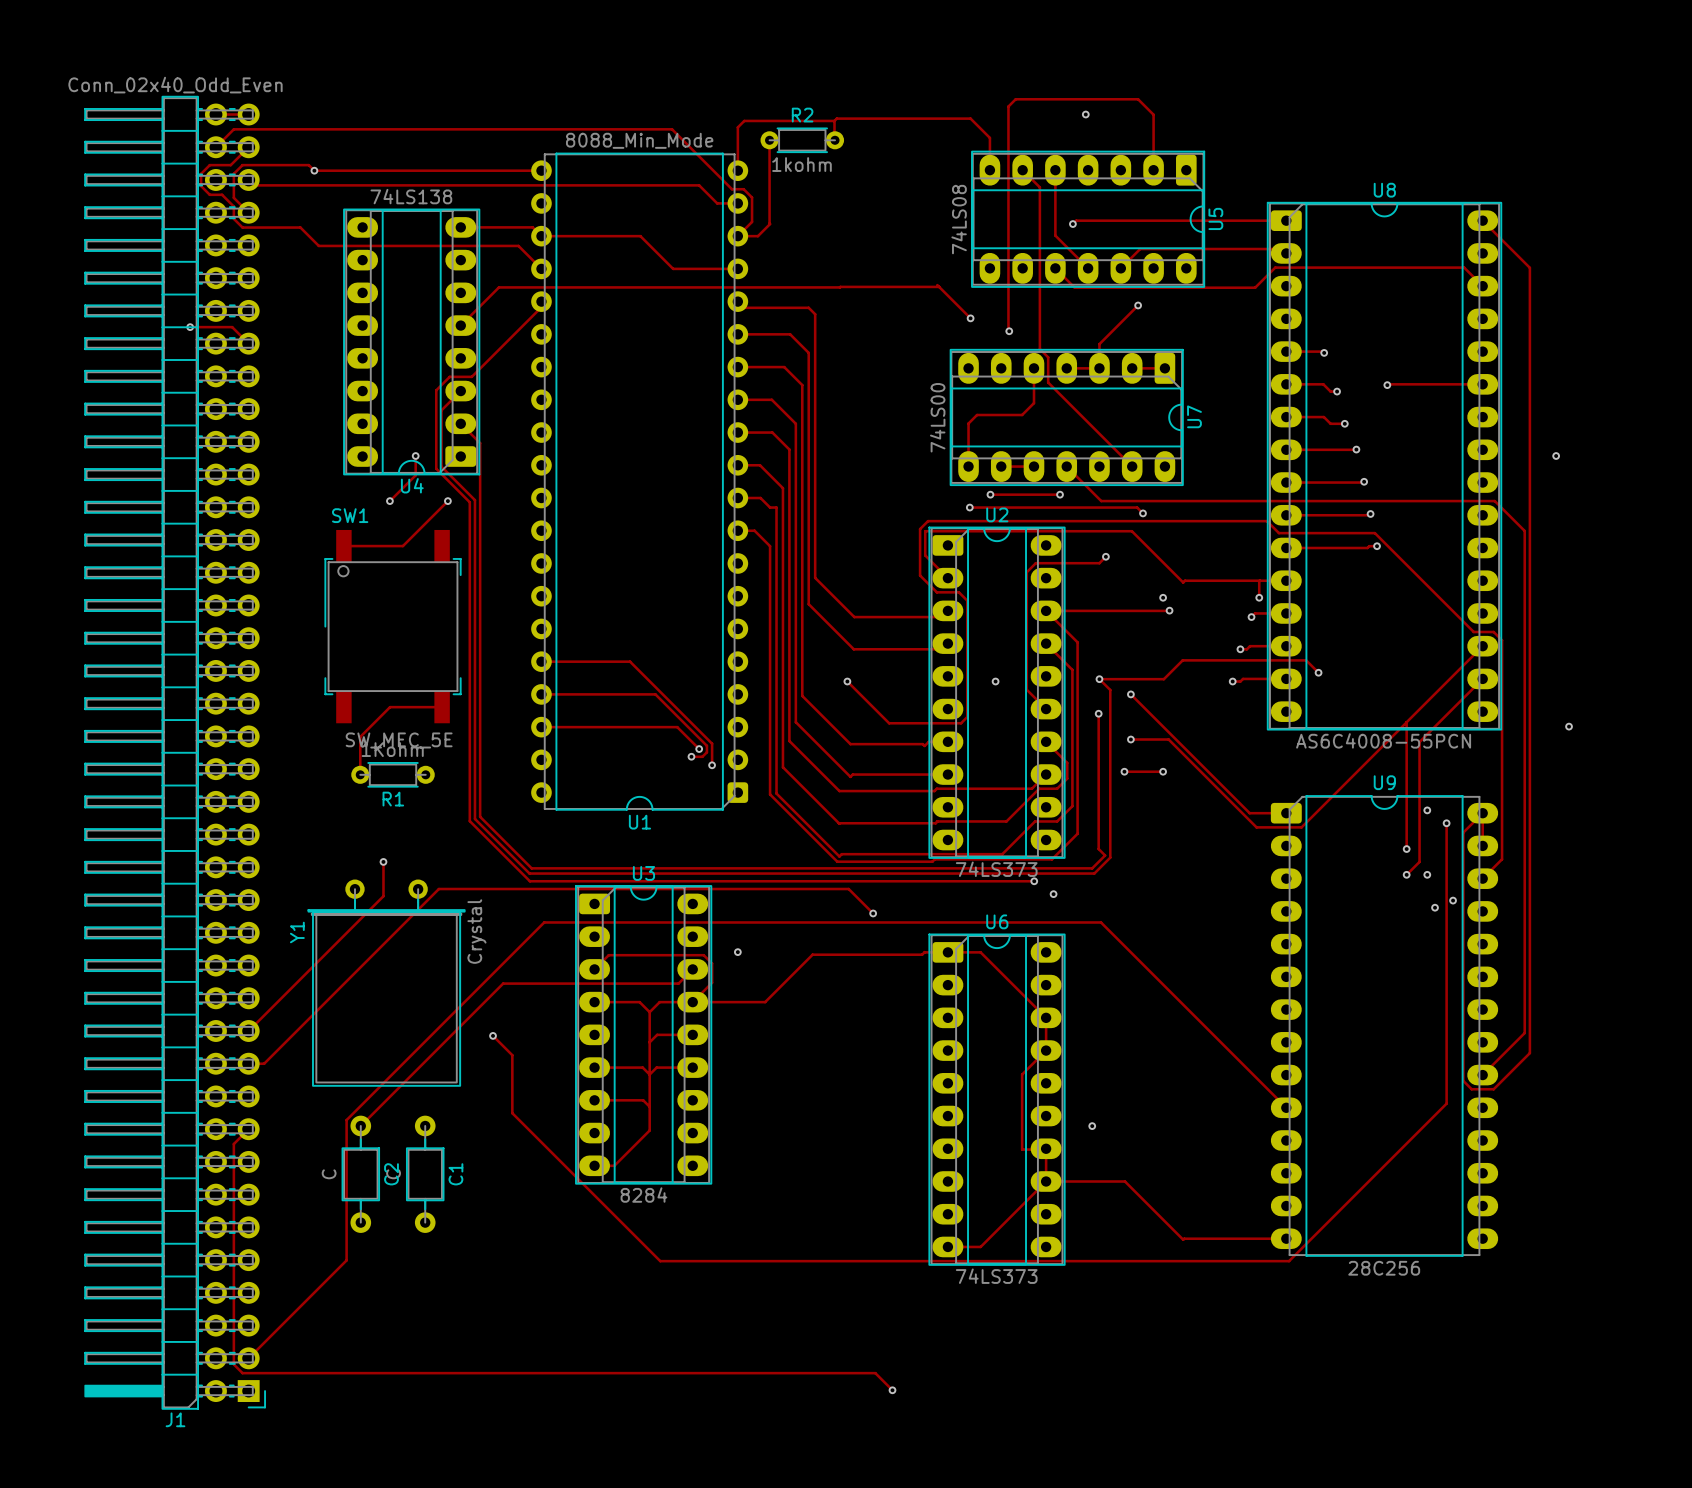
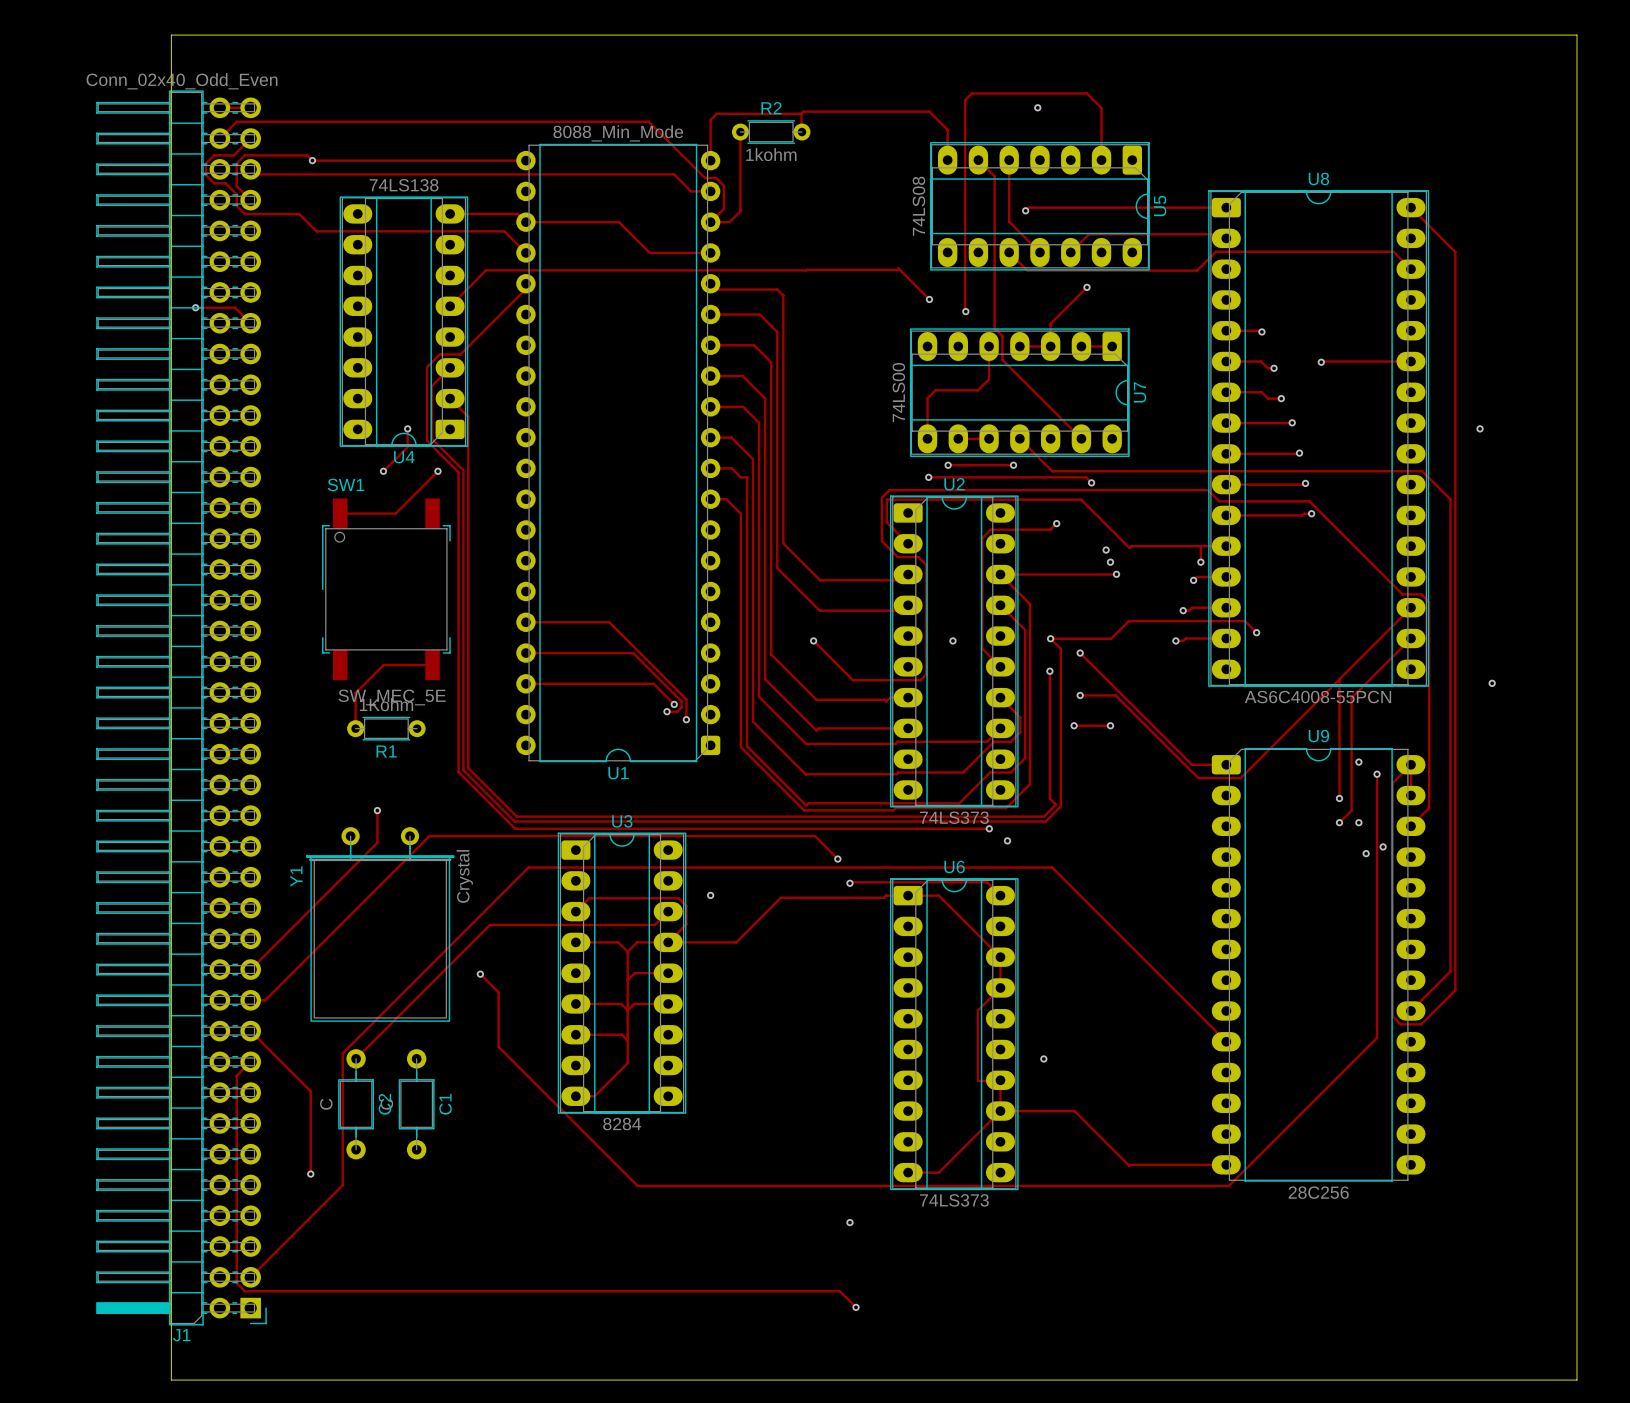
board edge: none -> (171, 35) (1576, 35) (1576, 1380) (171, 1380) (171, 35)
via: none -> (1106, 550)
track: none -> (849, 883) (987, 882) (1000, 895)
via: none -> (849, 883)
track: none -> (250, 1031) (310, 1091) (310, 1174)
via: none -> (310, 1174)
via: none -> (849, 1222)

